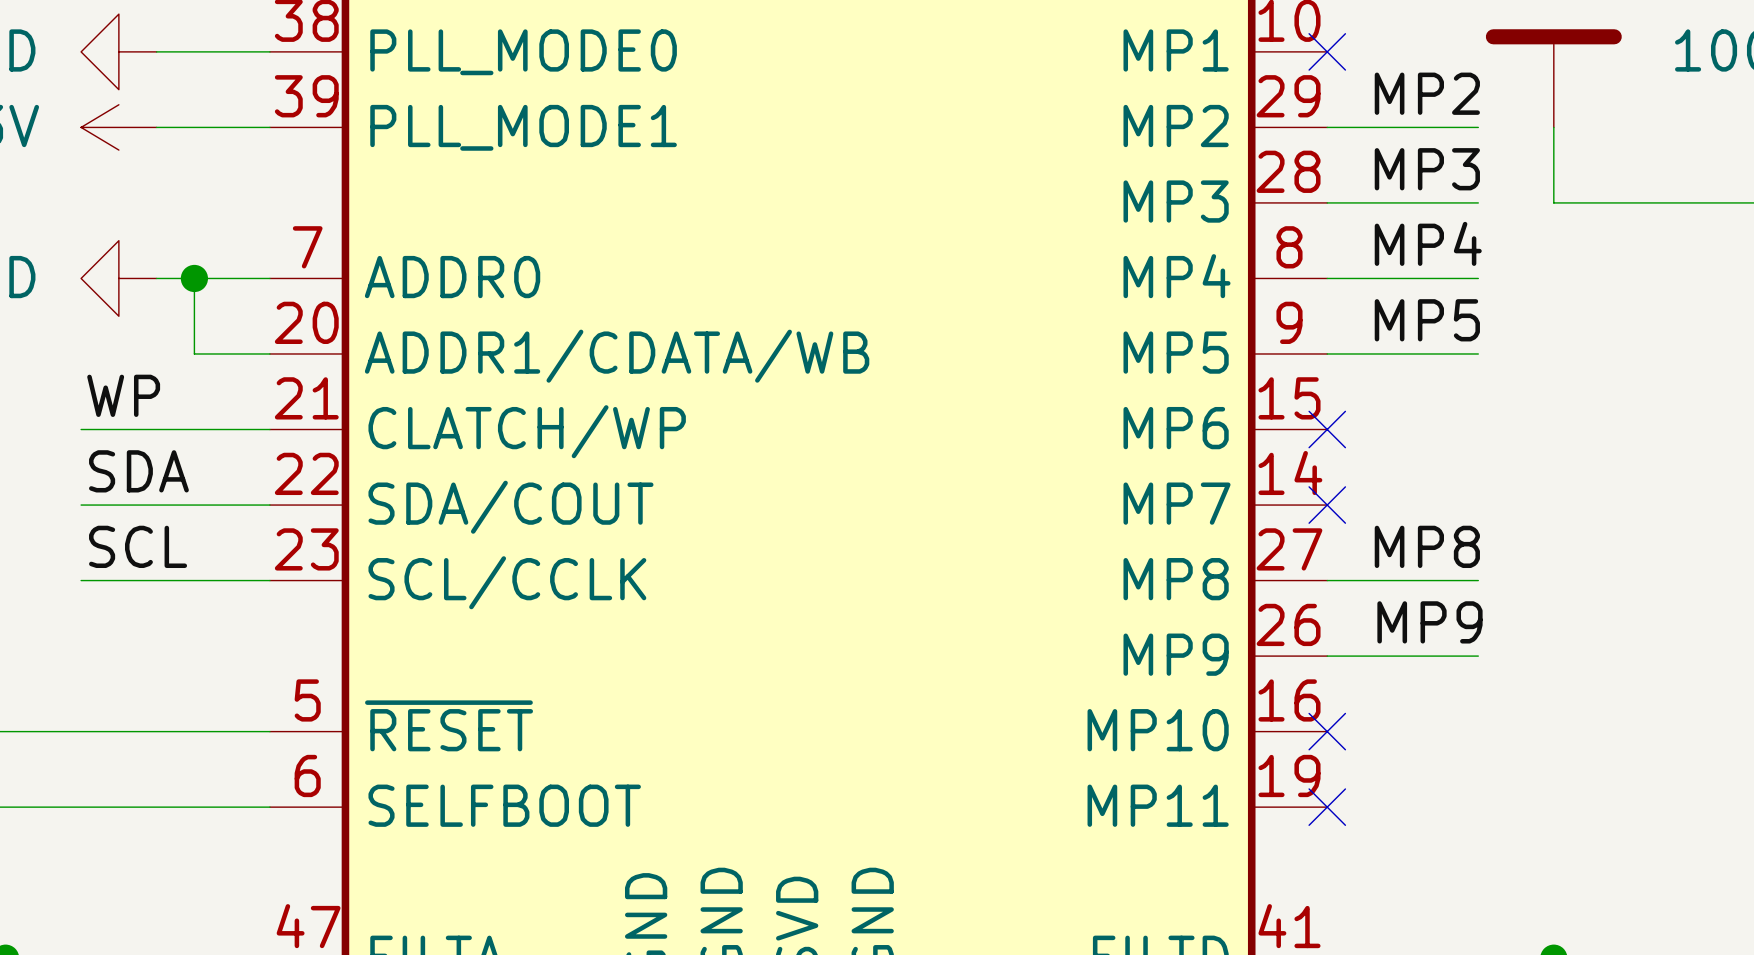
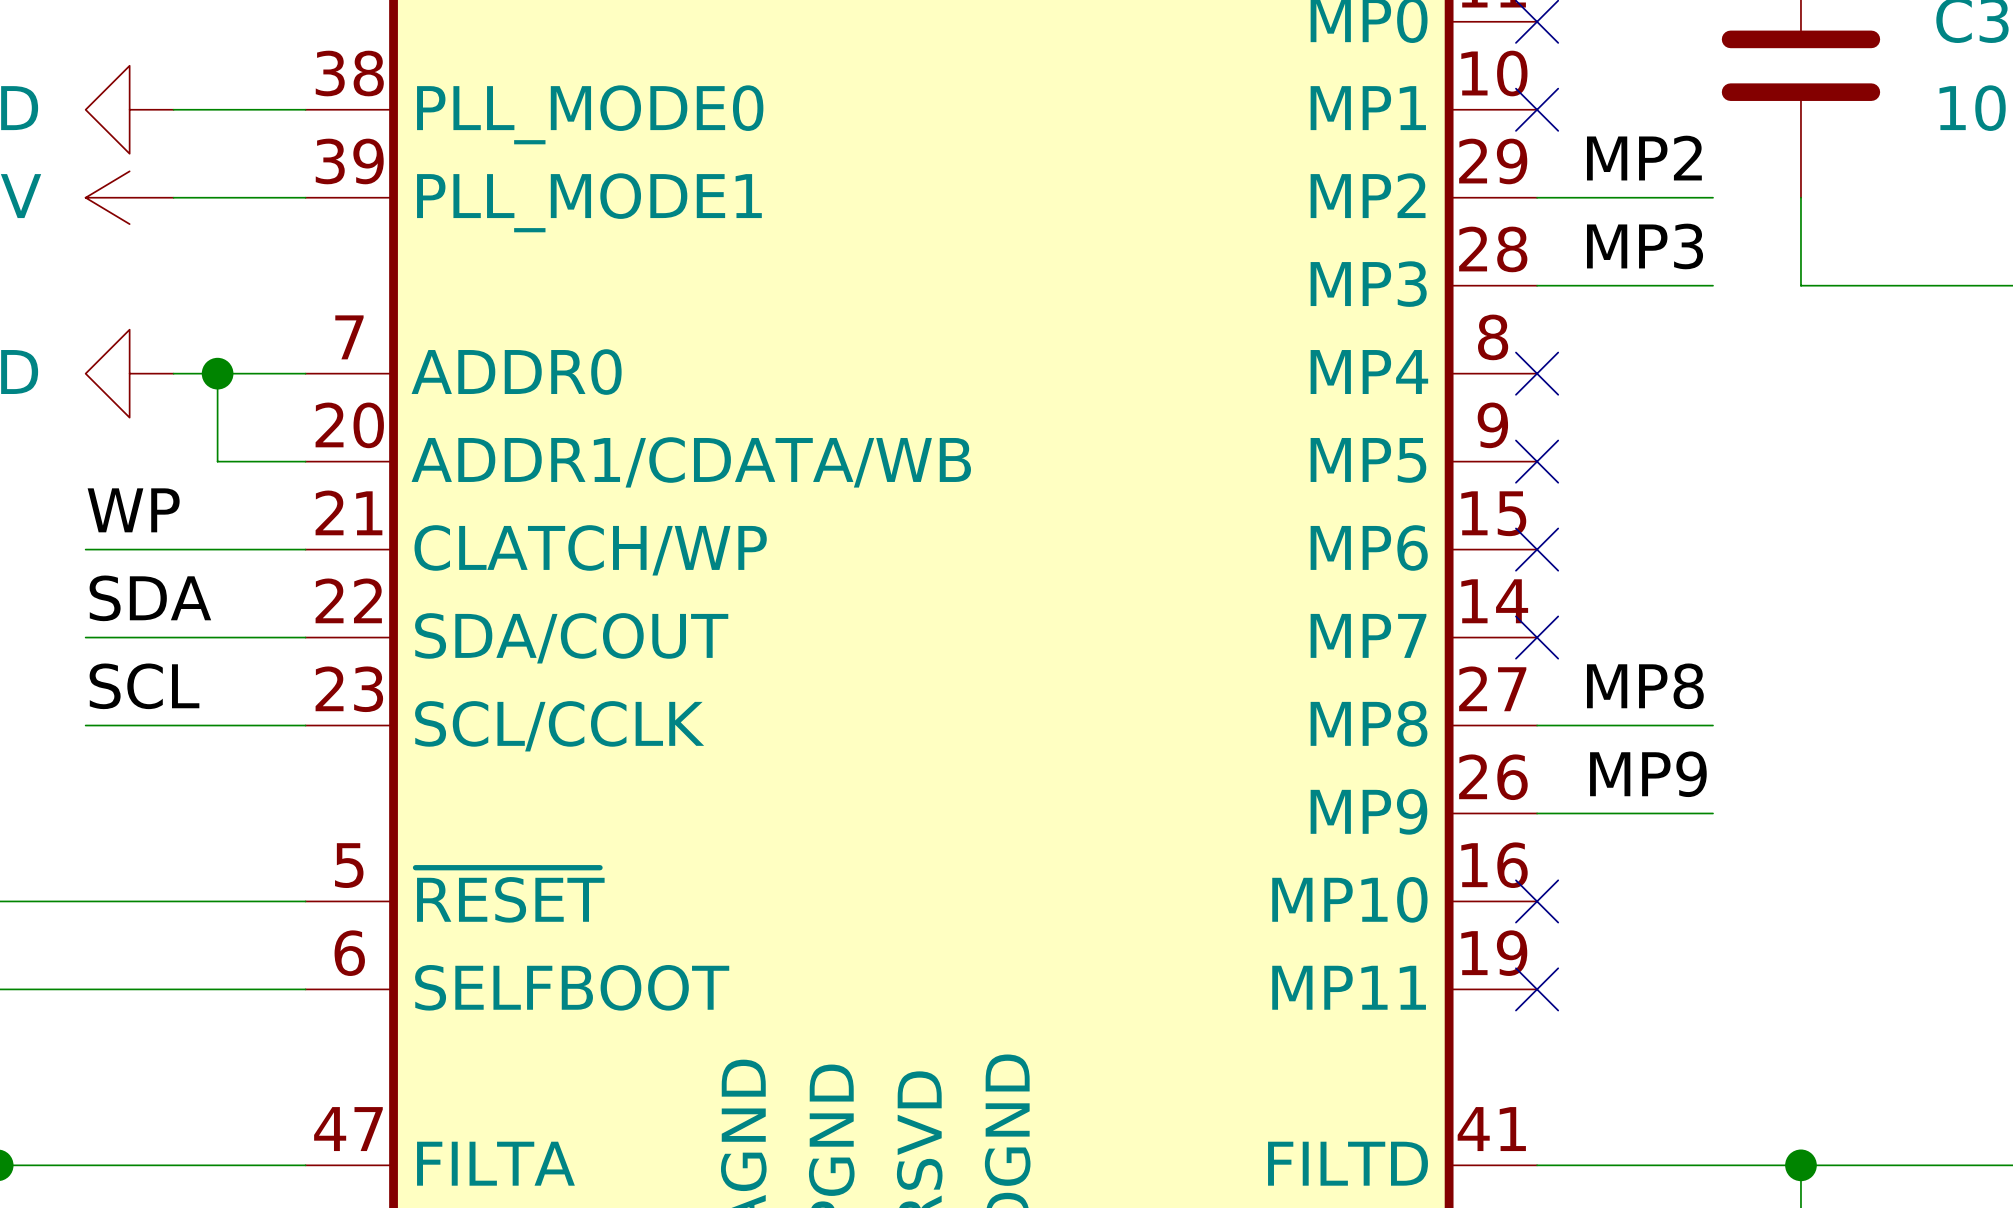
label: MP4 (1428, 243) -> none
wire: (1327, 278) (1478, 278) -> none
no-connect mark: none -> (1537, 373)
label: MP5 (1427, 320) -> none
wire: (1327, 353) (1478, 353) -> none
no-connect mark: none -> (1537, 461)

